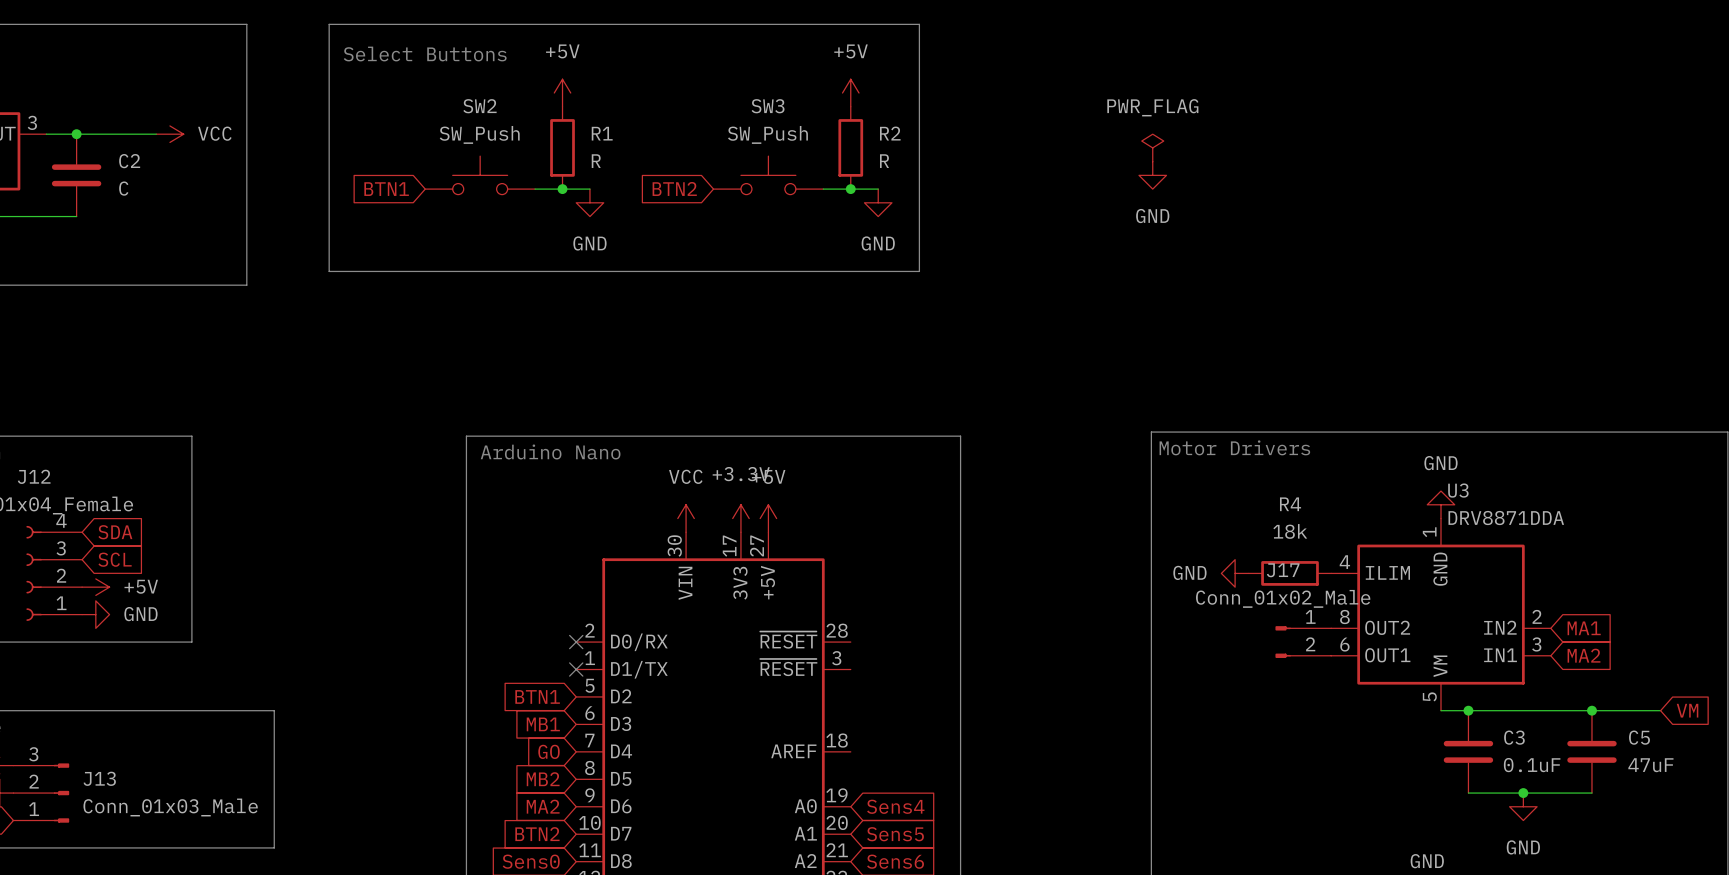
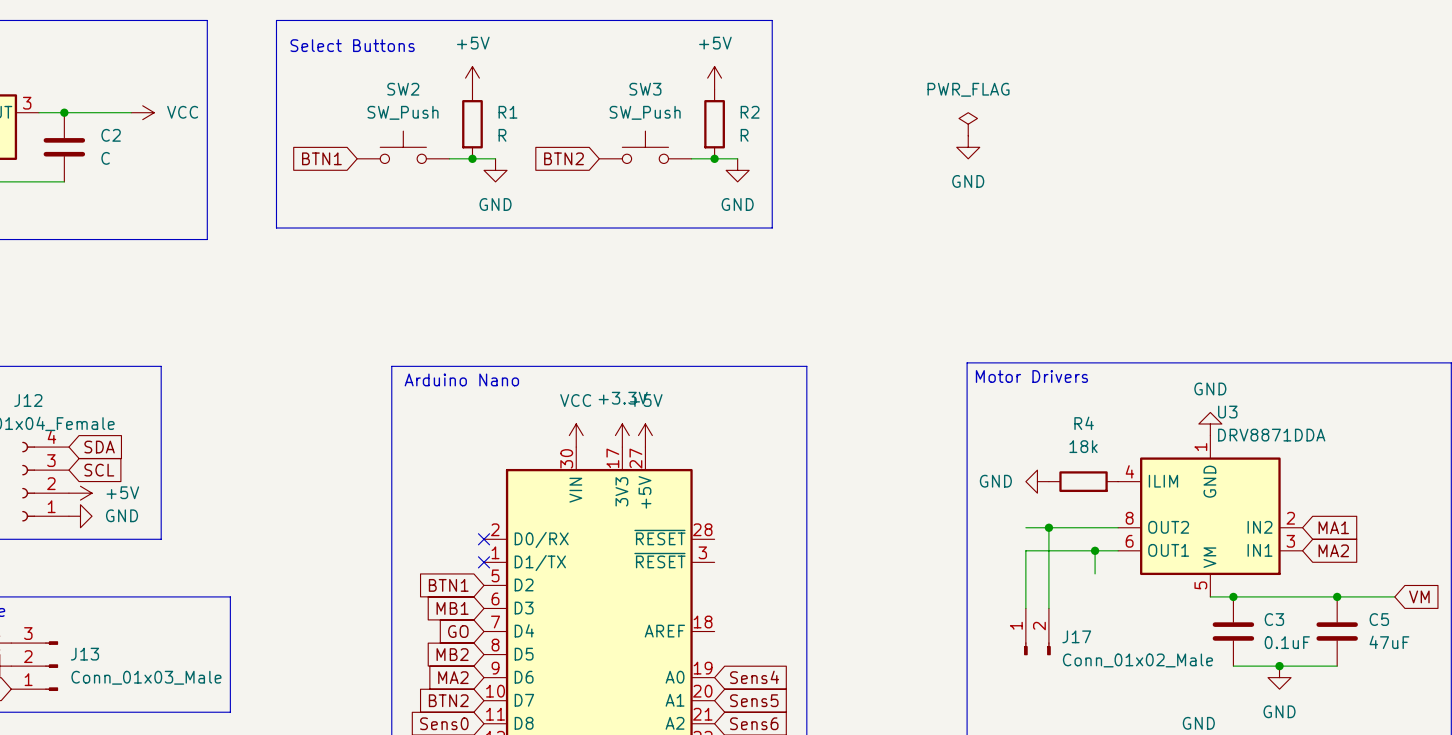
J17 name position: J17 (1283, 570) -> J17 (1076, 636)
J17 value position: Conn_01x02_Male (1283, 598) -> Conn_01x02_Male (1137, 660)
wire: none -> (1025, 527) (1118, 527)
wire: none -> (1048, 527) (1048, 608)
junction: none -> (1048, 527)
J17 rotation: 0° (1283, 642) -> 90° counterclockwise (1037, 648)
J17 position: (1303, 642) -> (1037, 631)
wire: none -> (1095, 550) (1095, 573)
junction: none -> (1095, 550)
wire: none -> (1118, 550) (1025, 550) (1025, 608)

